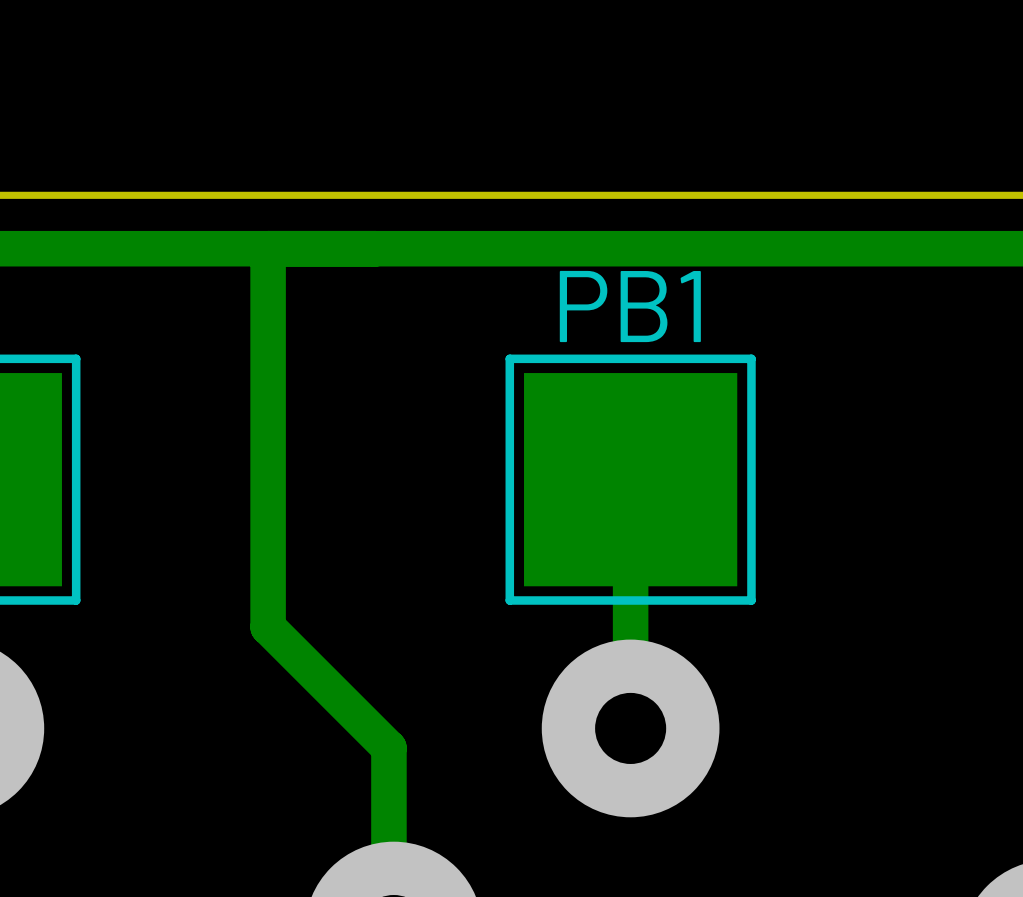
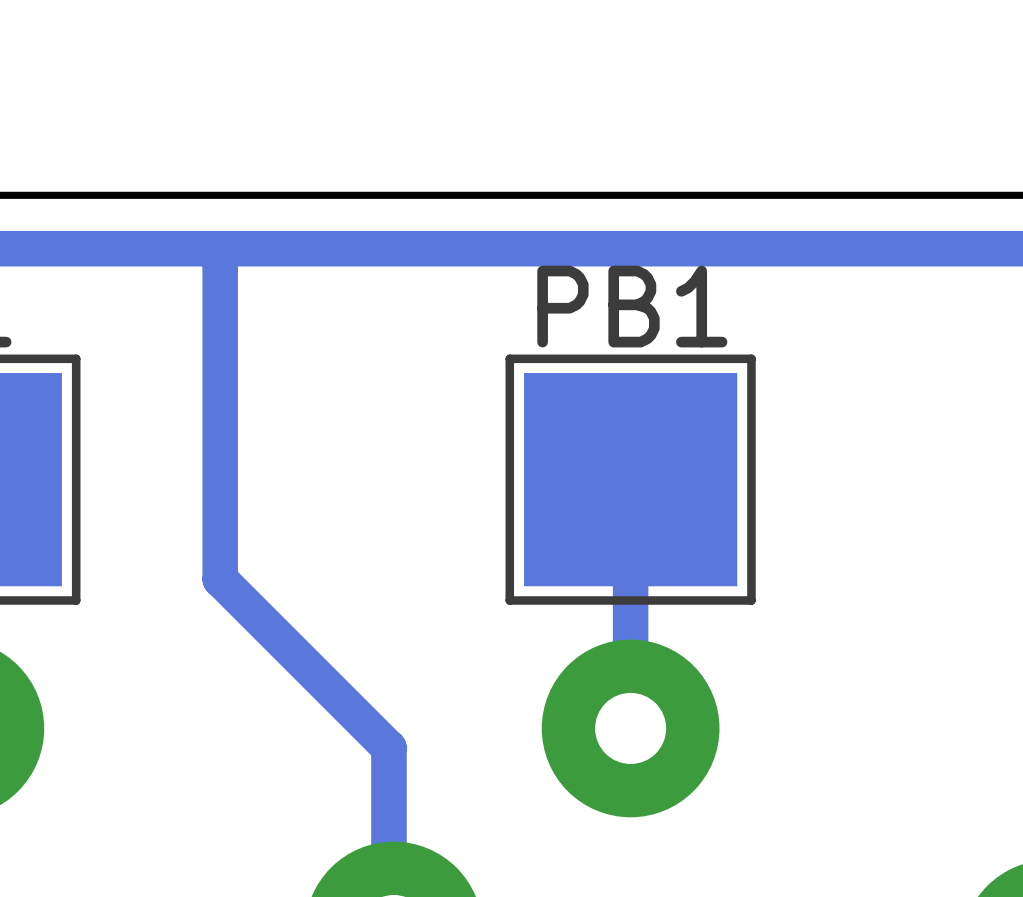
track: (268, 248) (268, 627) -> (220, 248) (220, 579) (268, 627)

